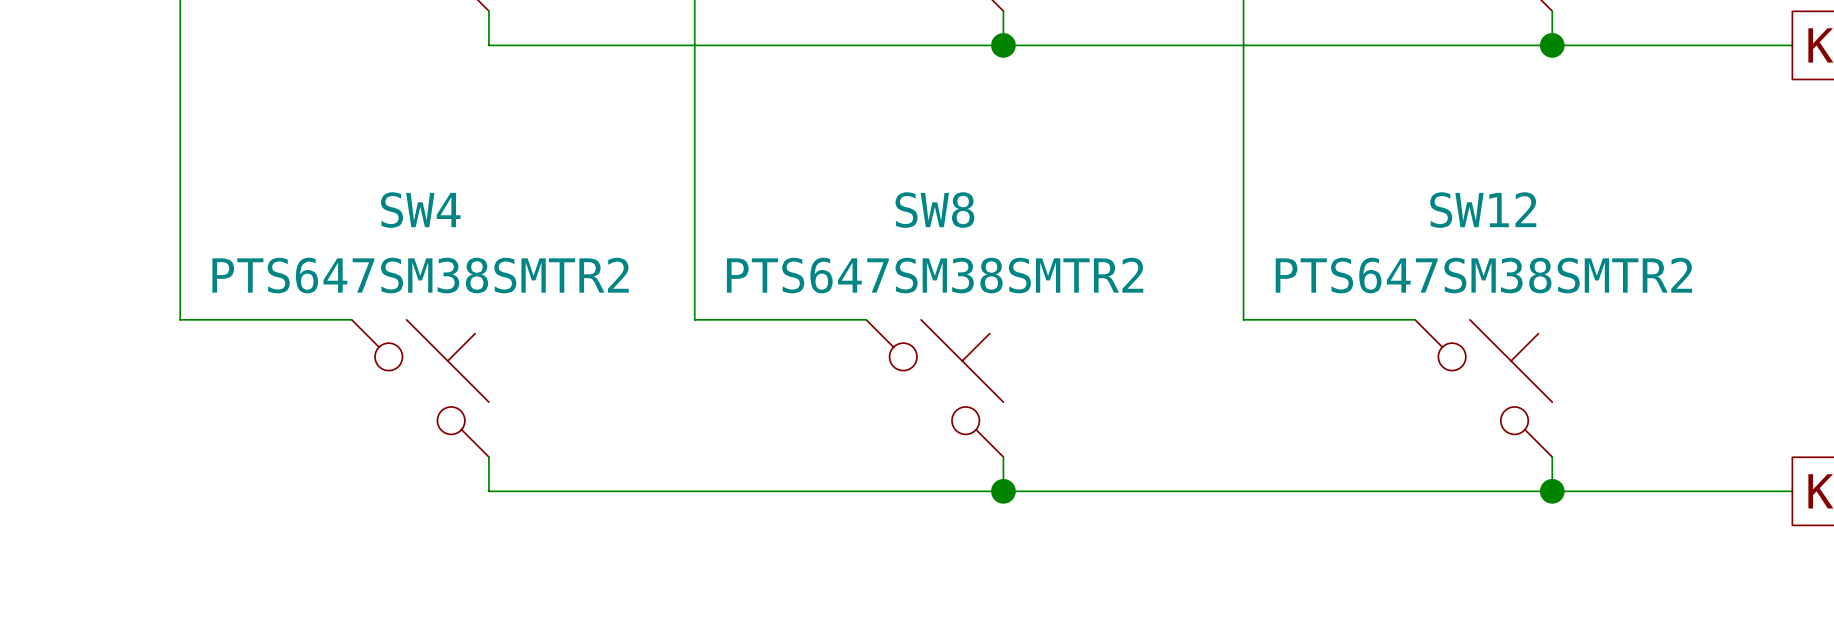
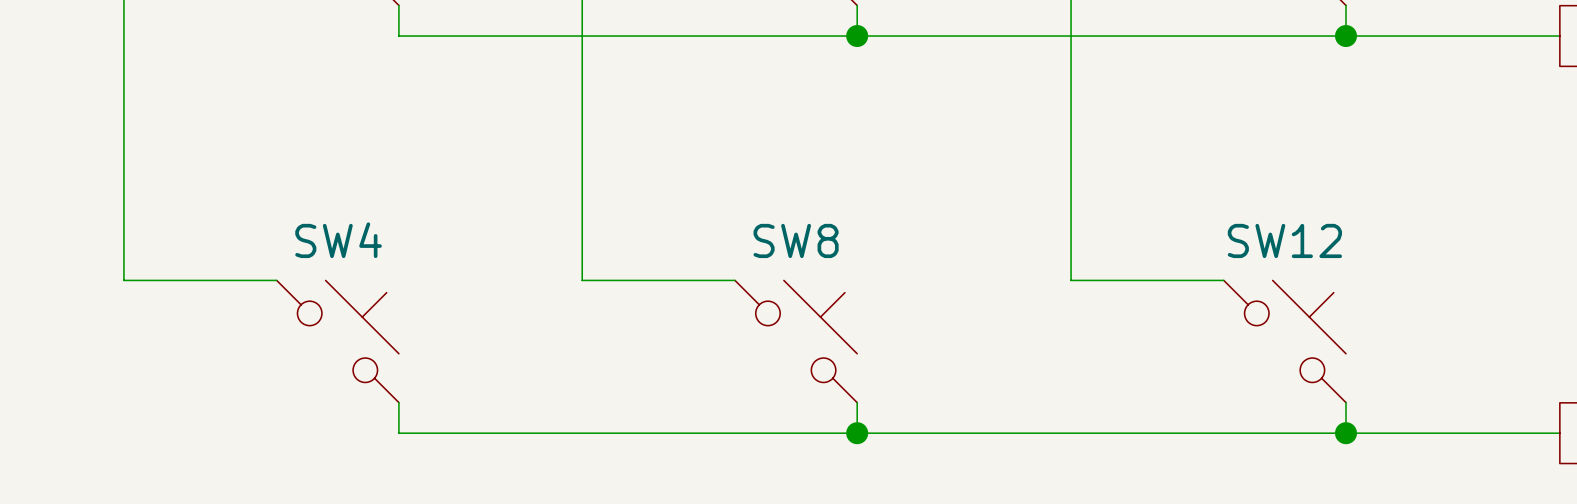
SW4 name position: SW4 (420, 210) -> SW4 (338, 240)
SW8 name position: SW8 (934, 210) -> SW8 (796, 240)
SW12 name position: SW12 (1483, 210) -> SW12 (1284, 240)
SW4 value: PTS647SM38SMTR2 (420, 275) -> none
SW8 value: PTS647SM38SMTR2 (935, 275) -> none
SW12 value: PTS647SM38SMTR2 (1483, 275) -> none

